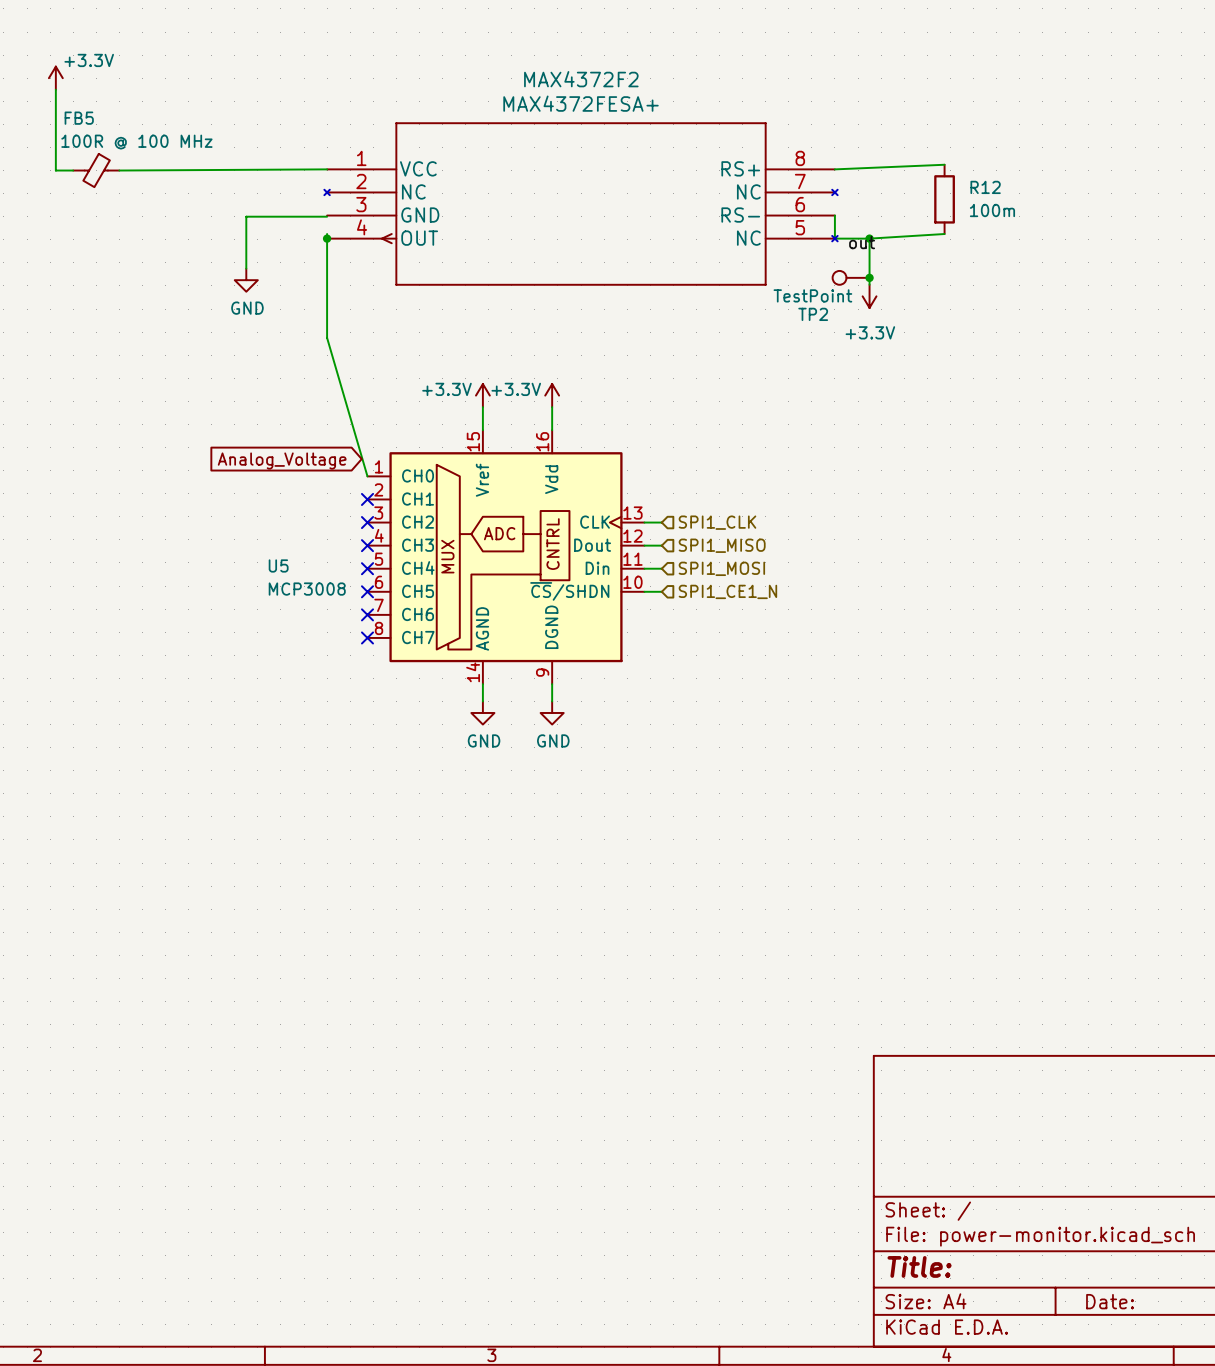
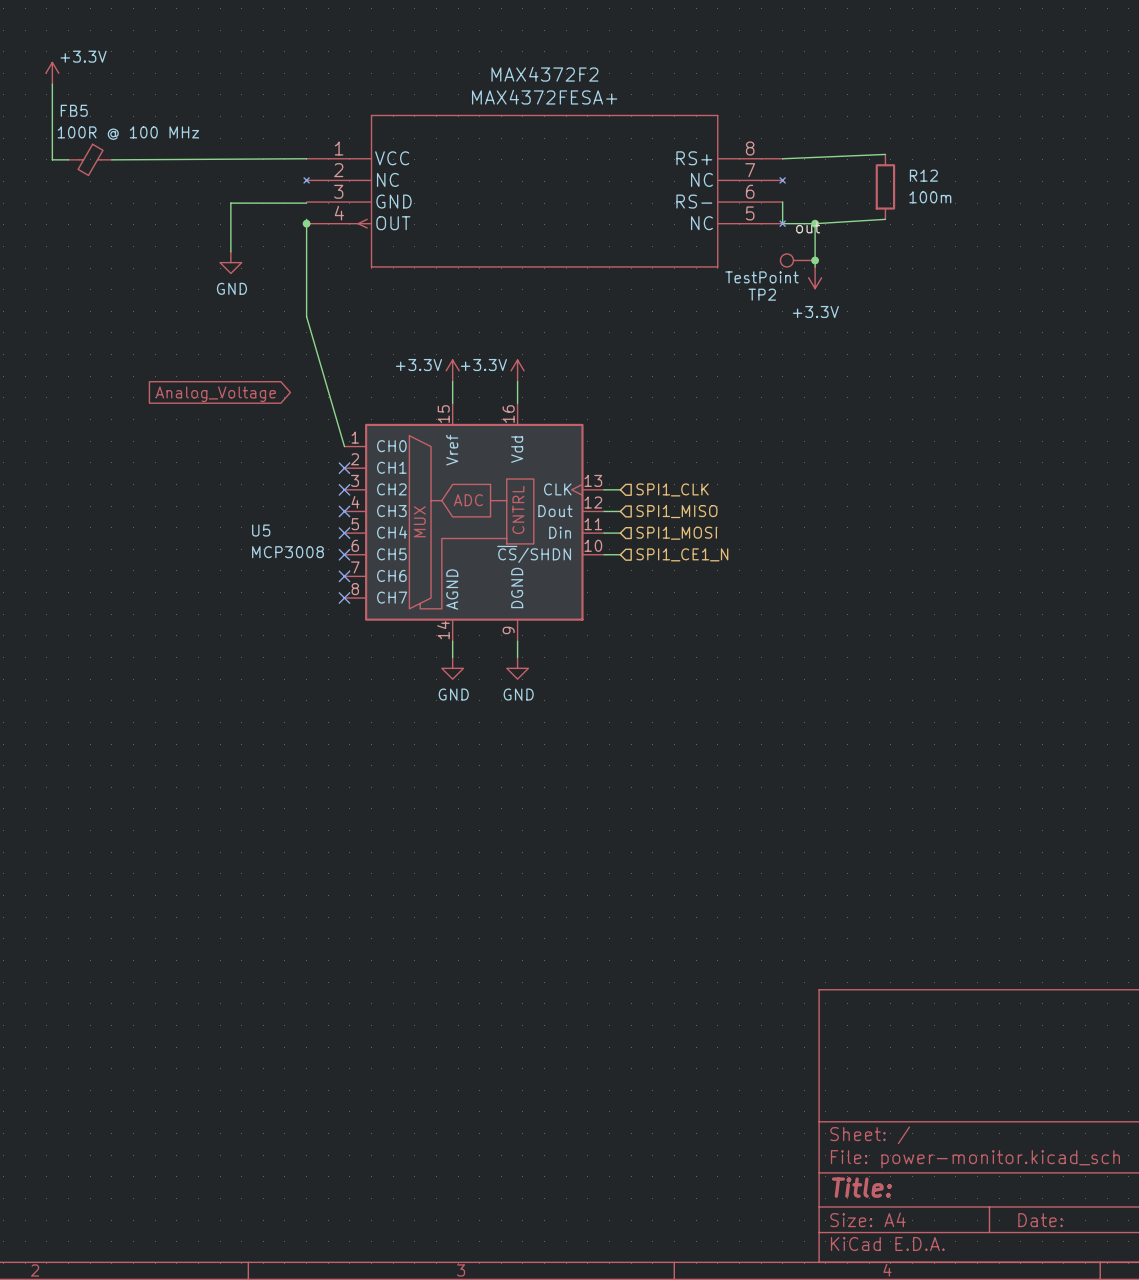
global label position: Analog_Voltage (282, 460) -> Analog_Voltage (215, 394)

